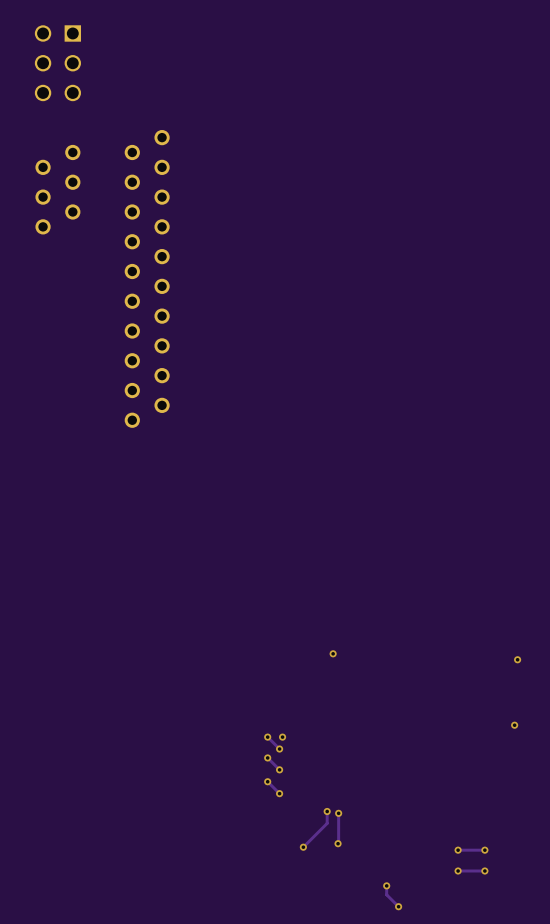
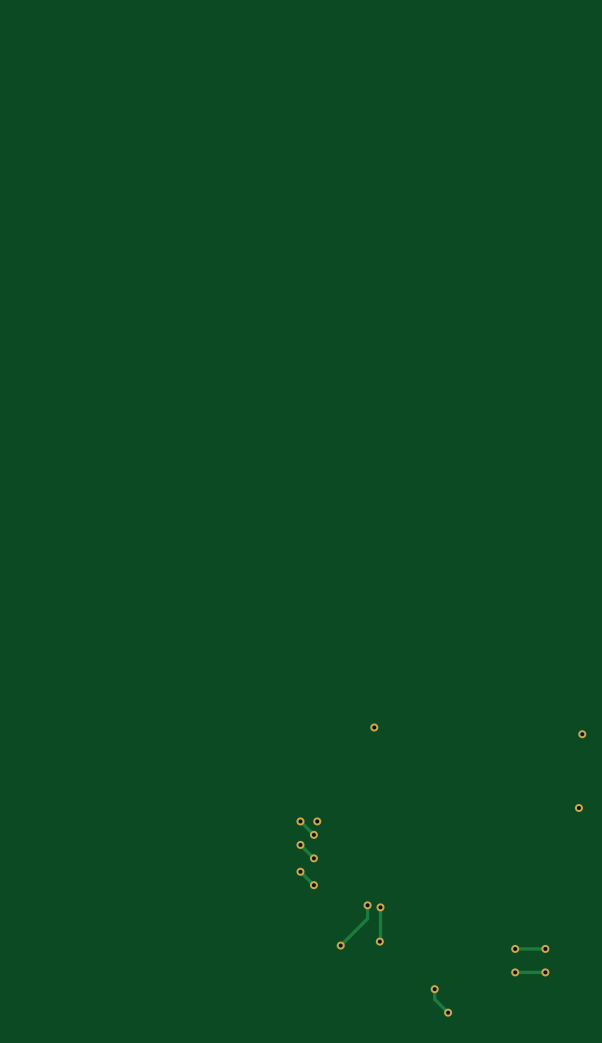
part: (57, 63) -> none
part: (57, 189) -> none
part: (147, 278) -> none

